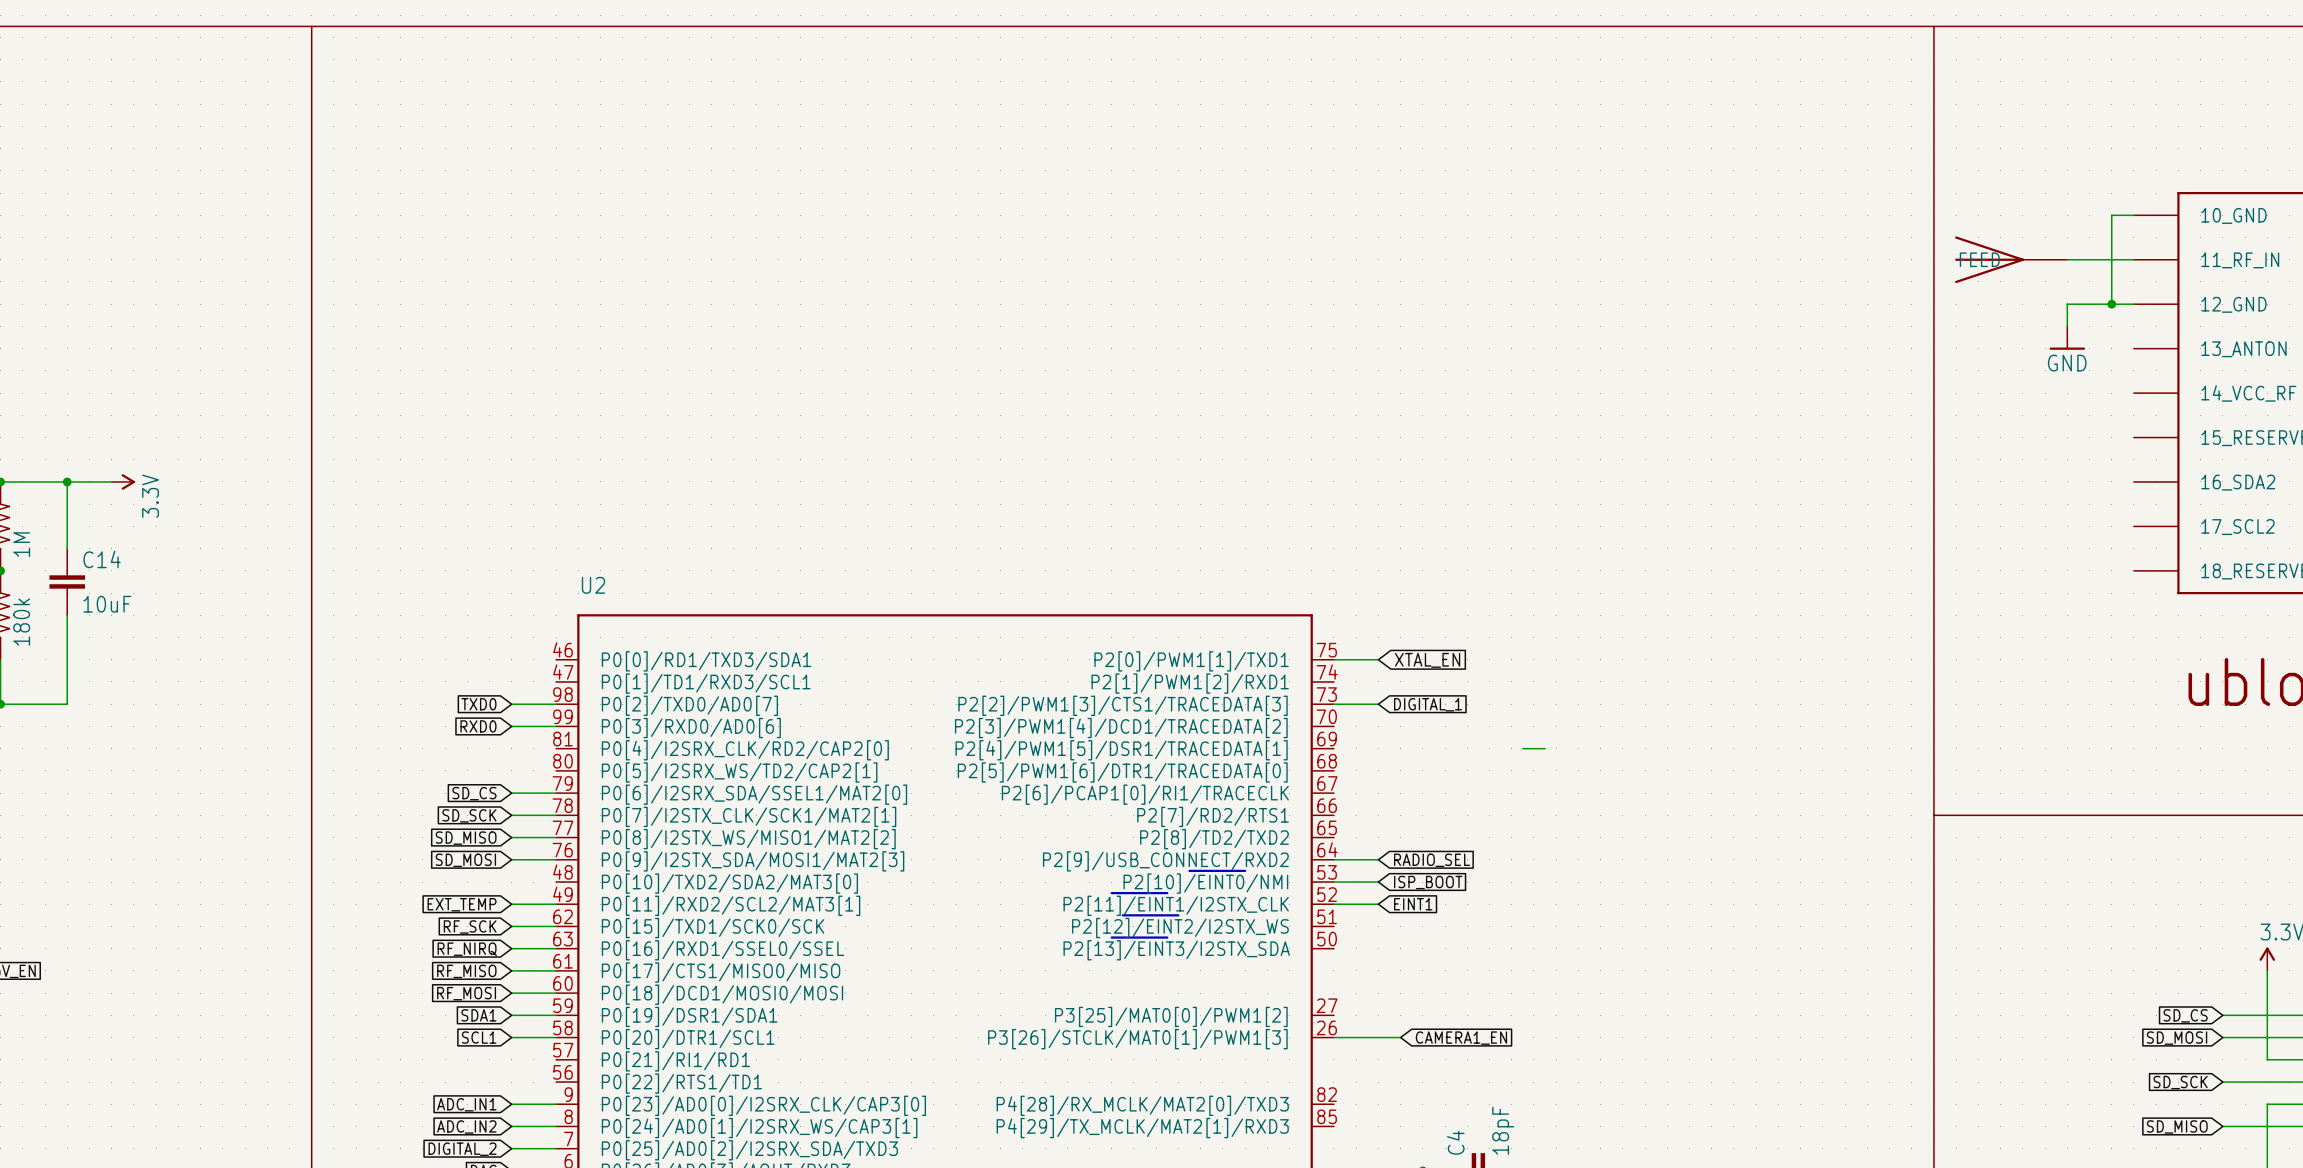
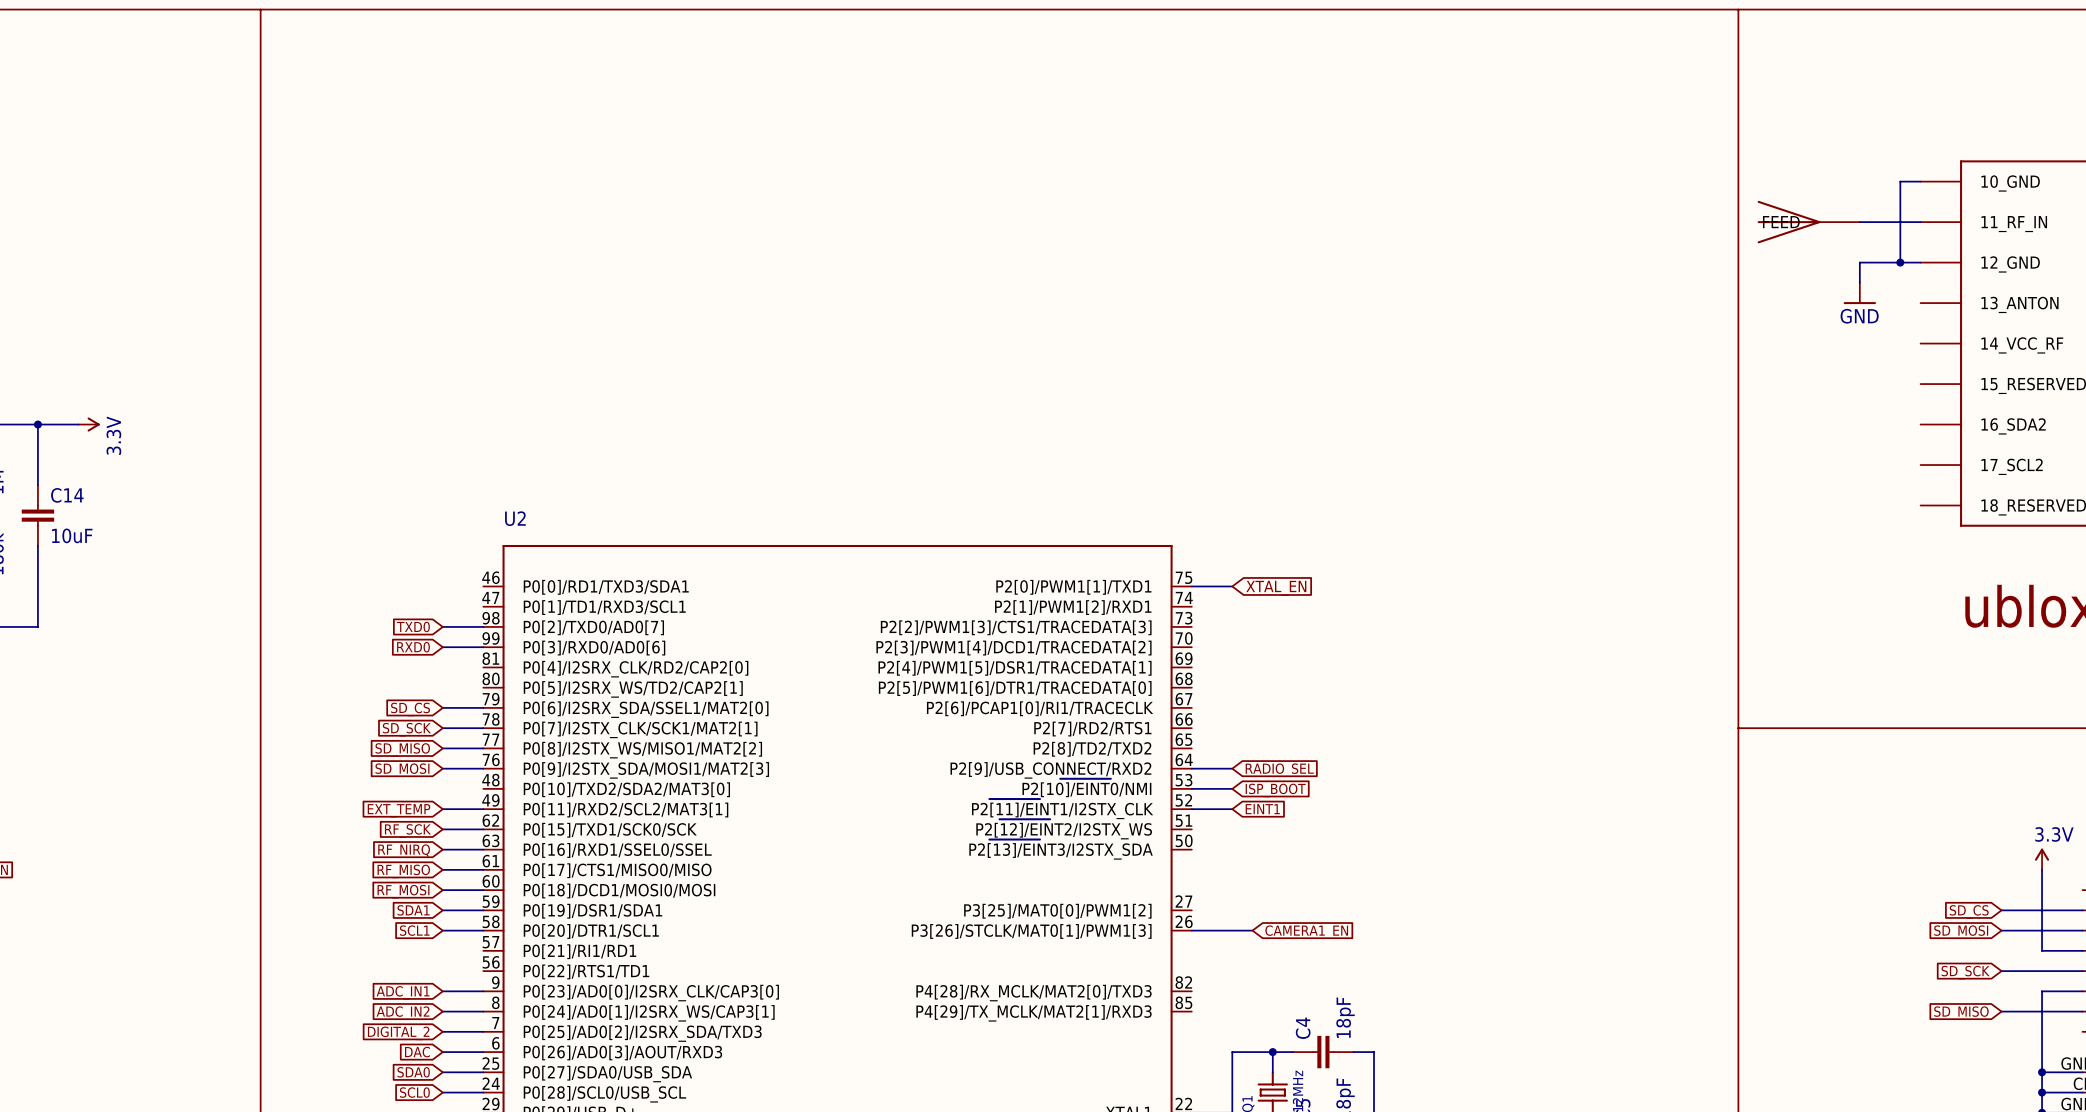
wire: (1333, 704) (1378, 704) -> none
global label: DIGITAL_1 (1428, 704) -> none
wire: (1522, 748) (1545, 748) -> none

